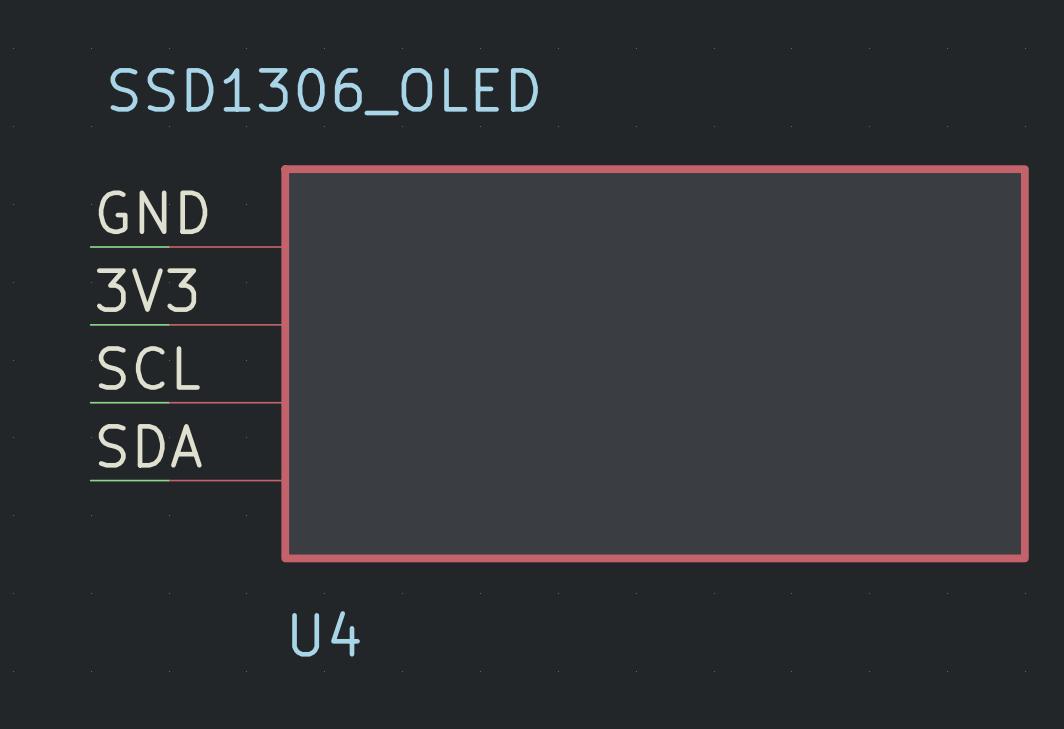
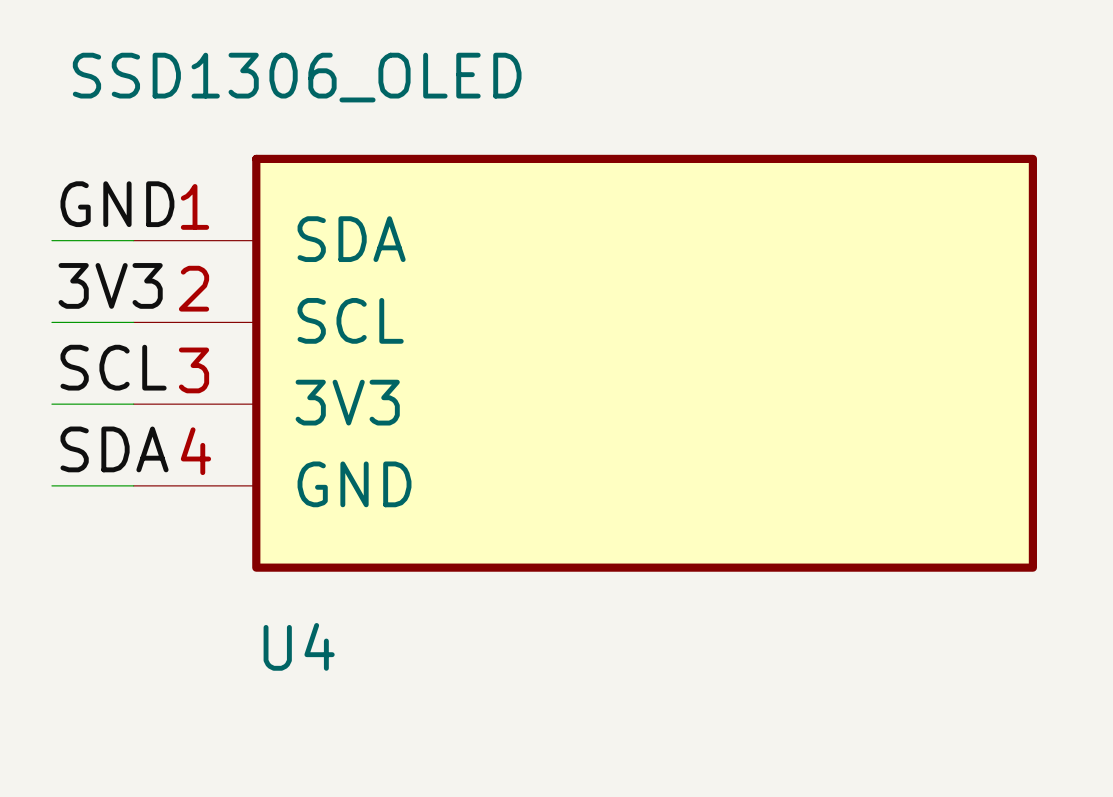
U4 pin number: none -> 1 (194, 206)
U4 pin name: none -> SDA (351, 239)
U4 pin number: none -> 2 (194, 288)
U4 pin name: none -> SCL (350, 320)
U4 pin number: none -> 3 (194, 370)
U4 pin name: none -> 3V3 (347, 402)
U4 pin number: none -> 4 (195, 451)
U4 pin name: none -> GND (354, 484)

